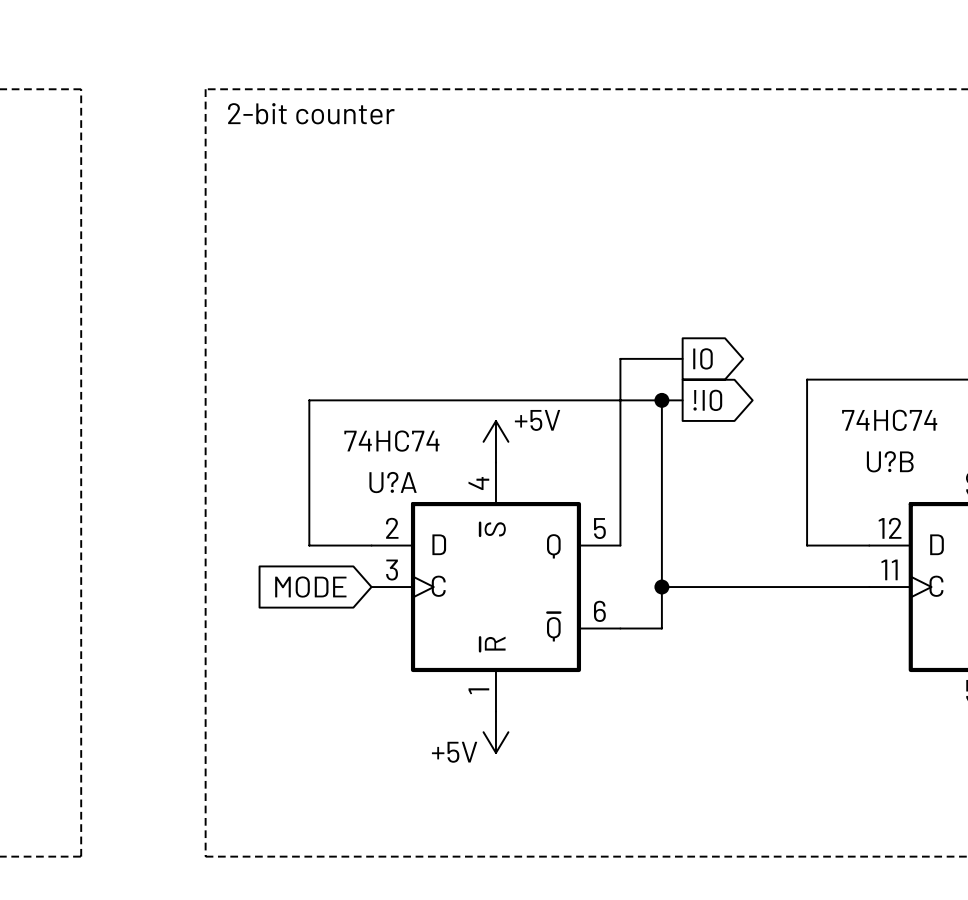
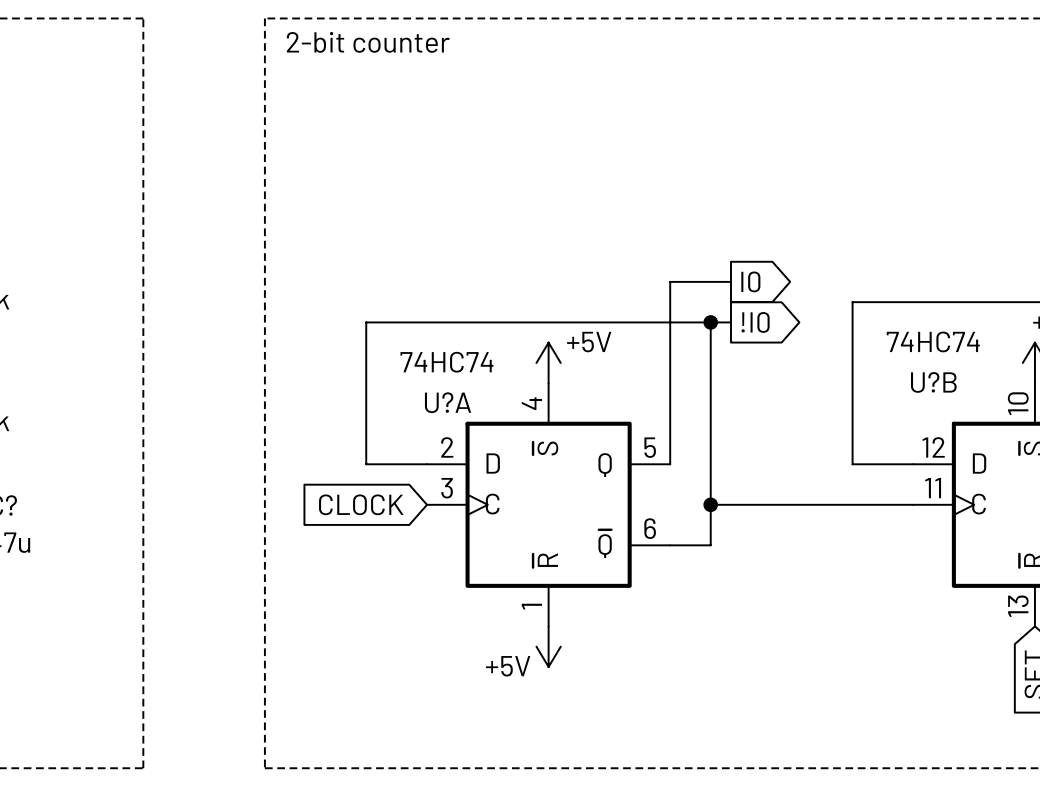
global label: MODE (310, 587) -> CLOCK (361, 504)

